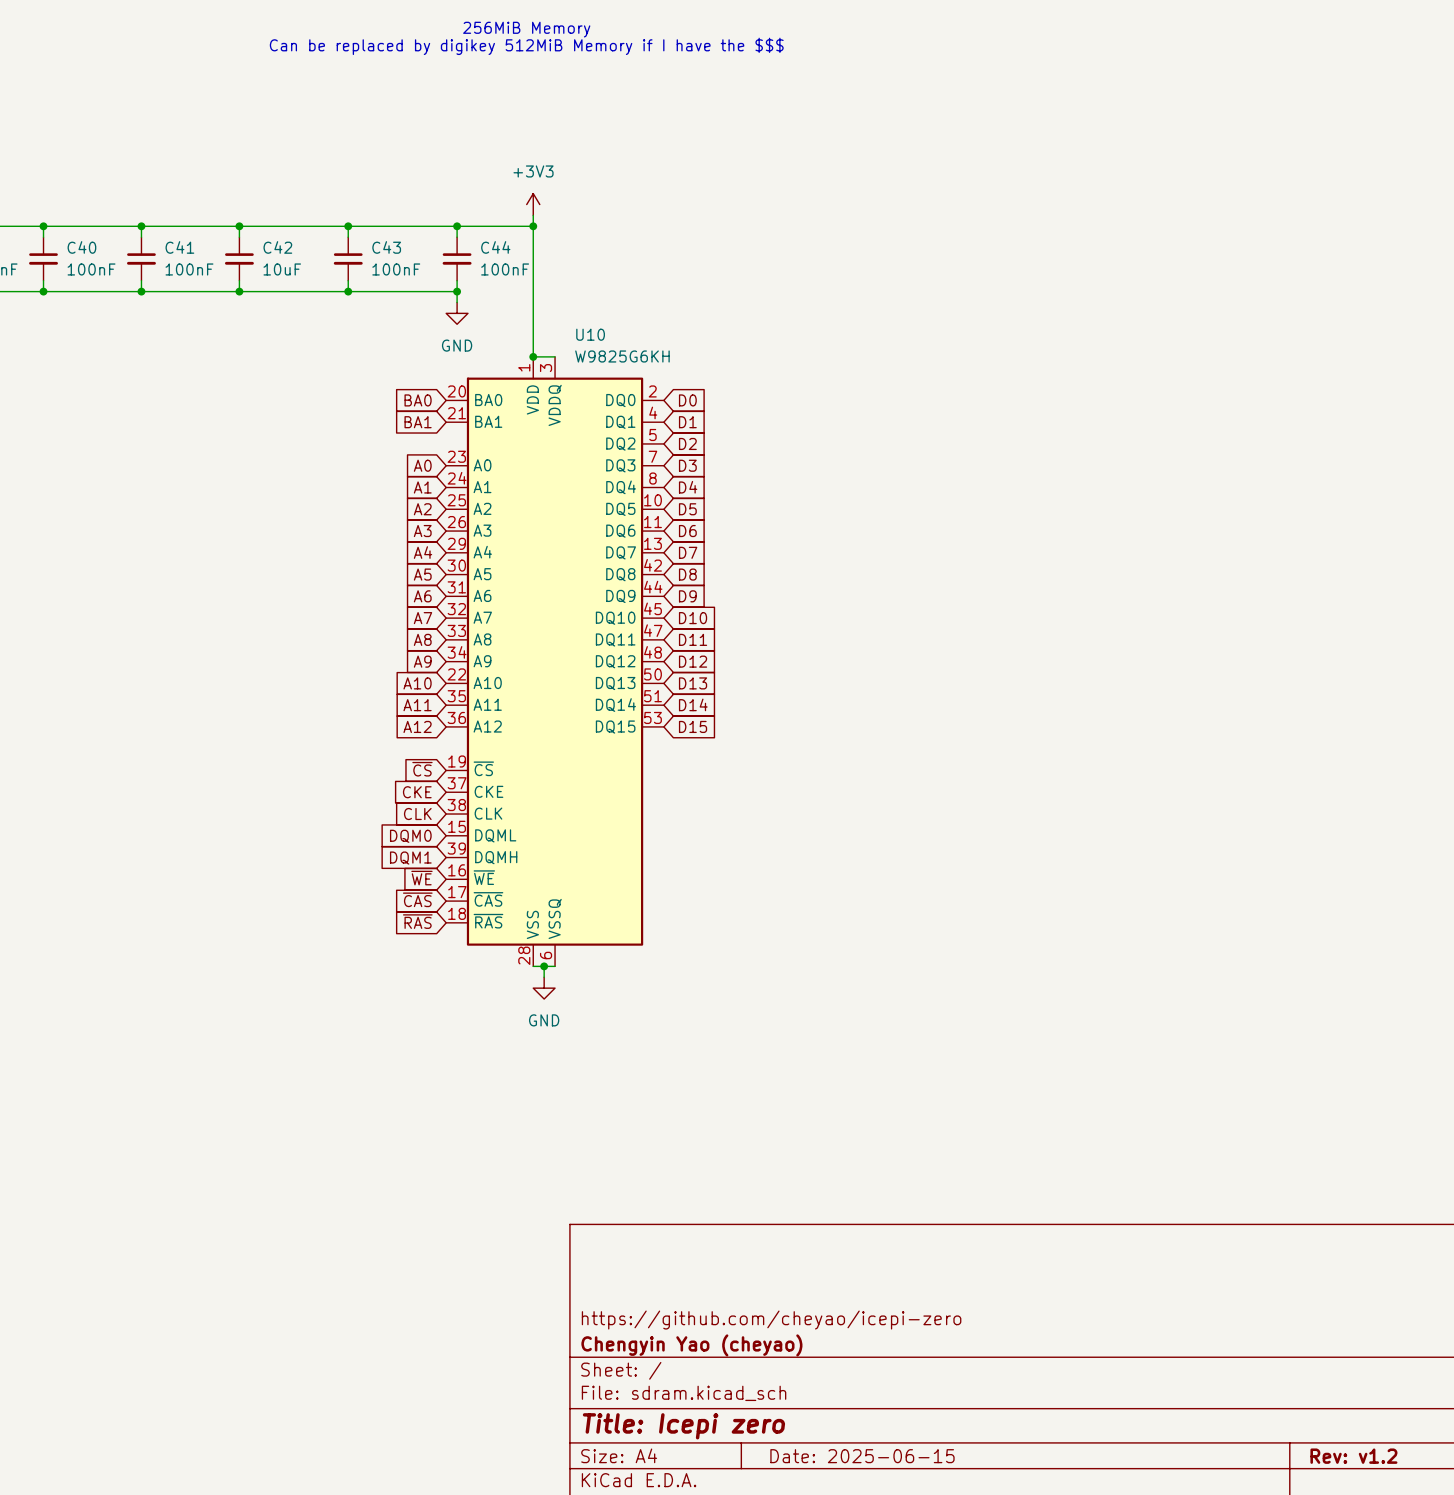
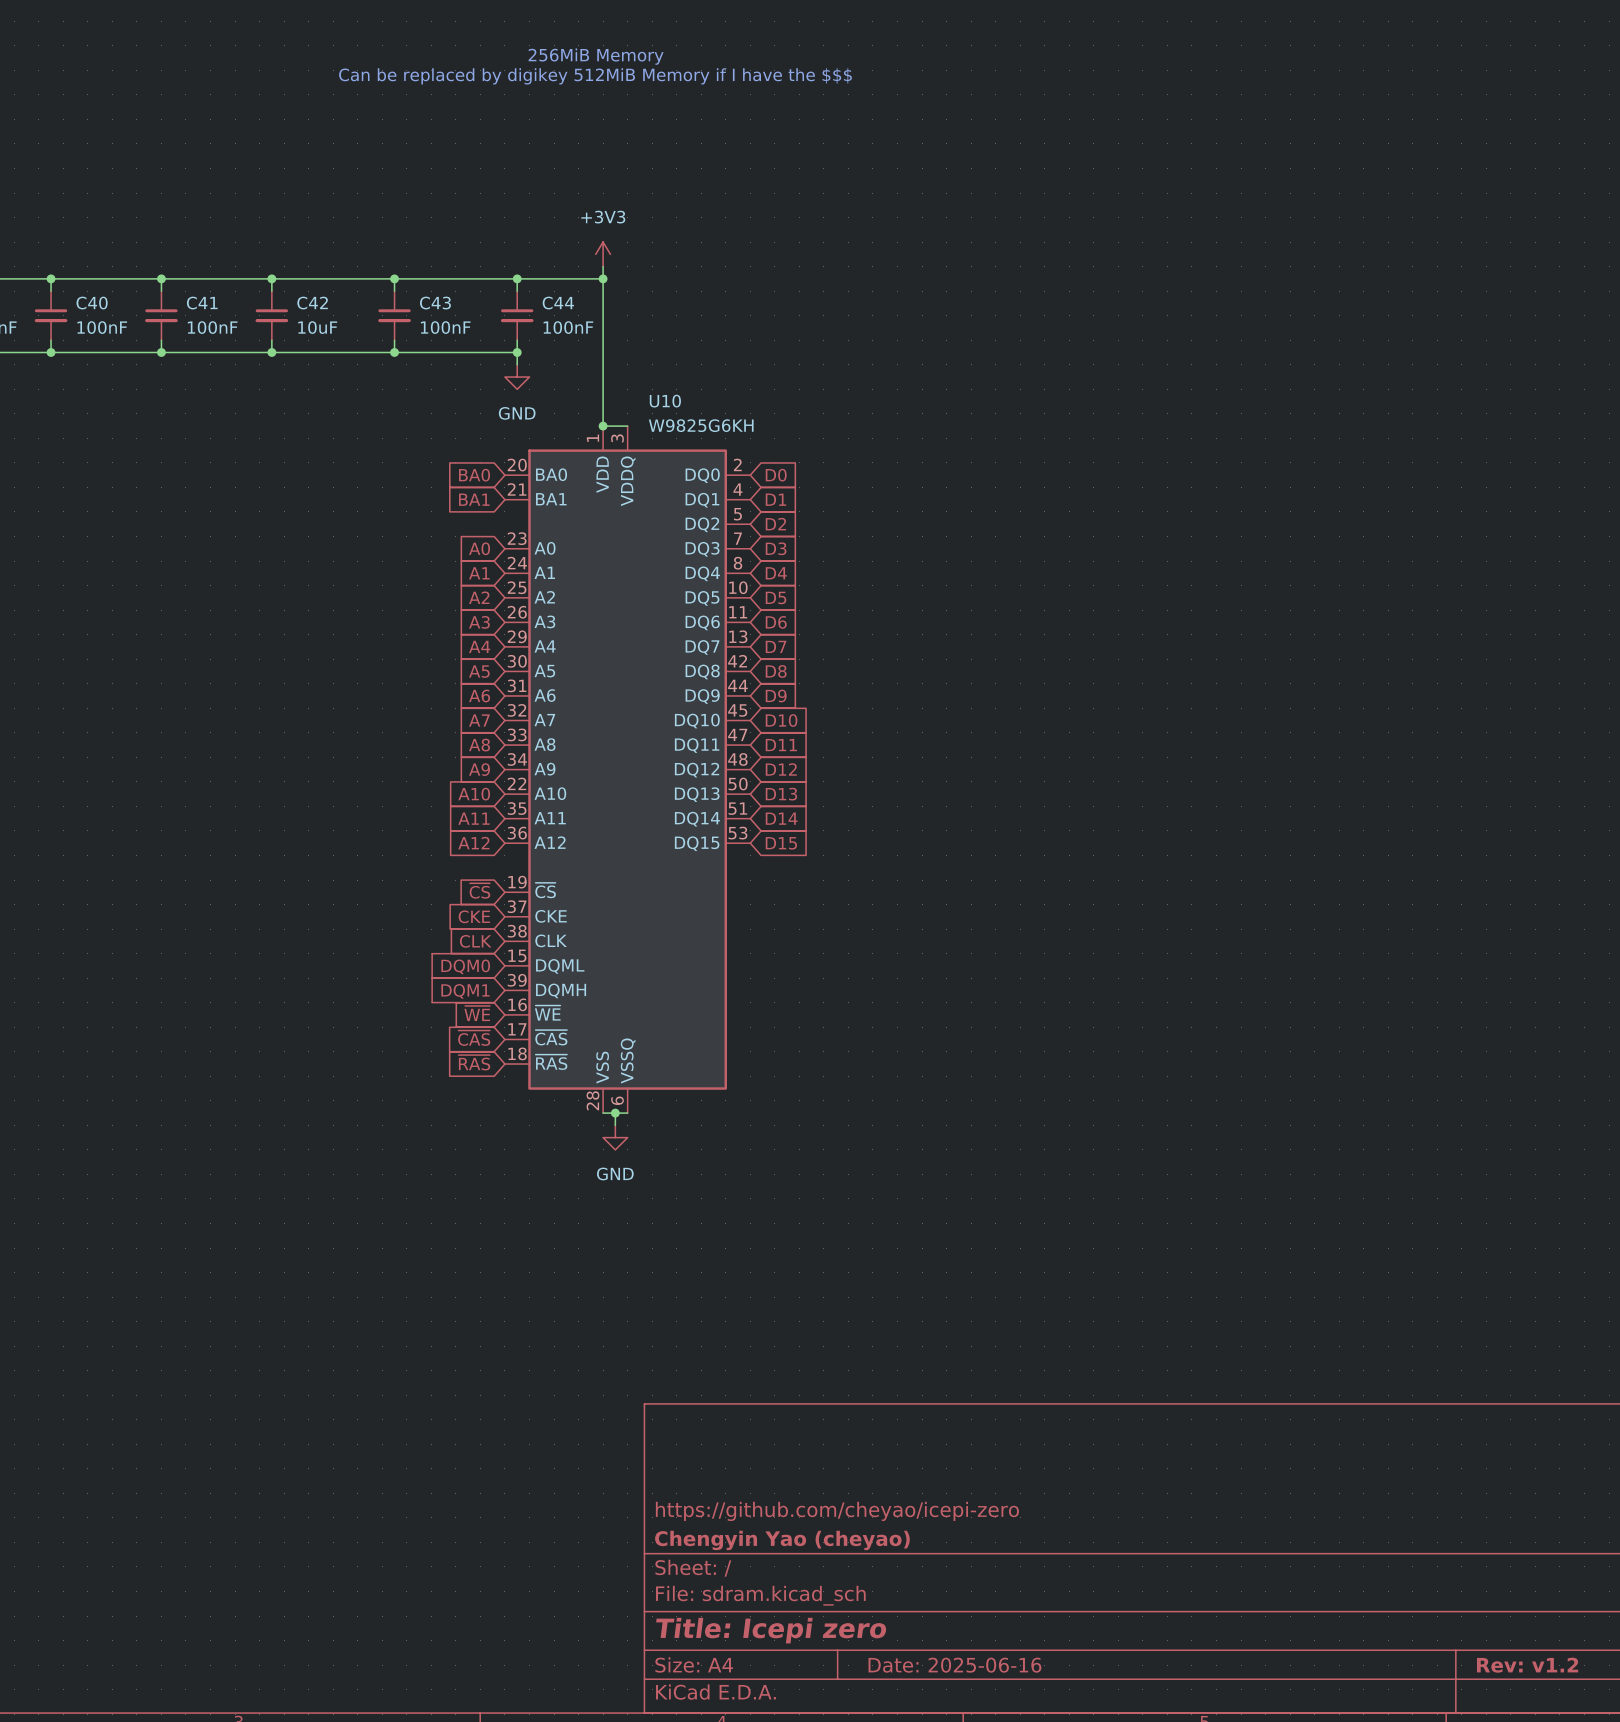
title block: Date: 2025-06-15 (862, 1456) -> Date: 2025-06-16 (954, 1665)

